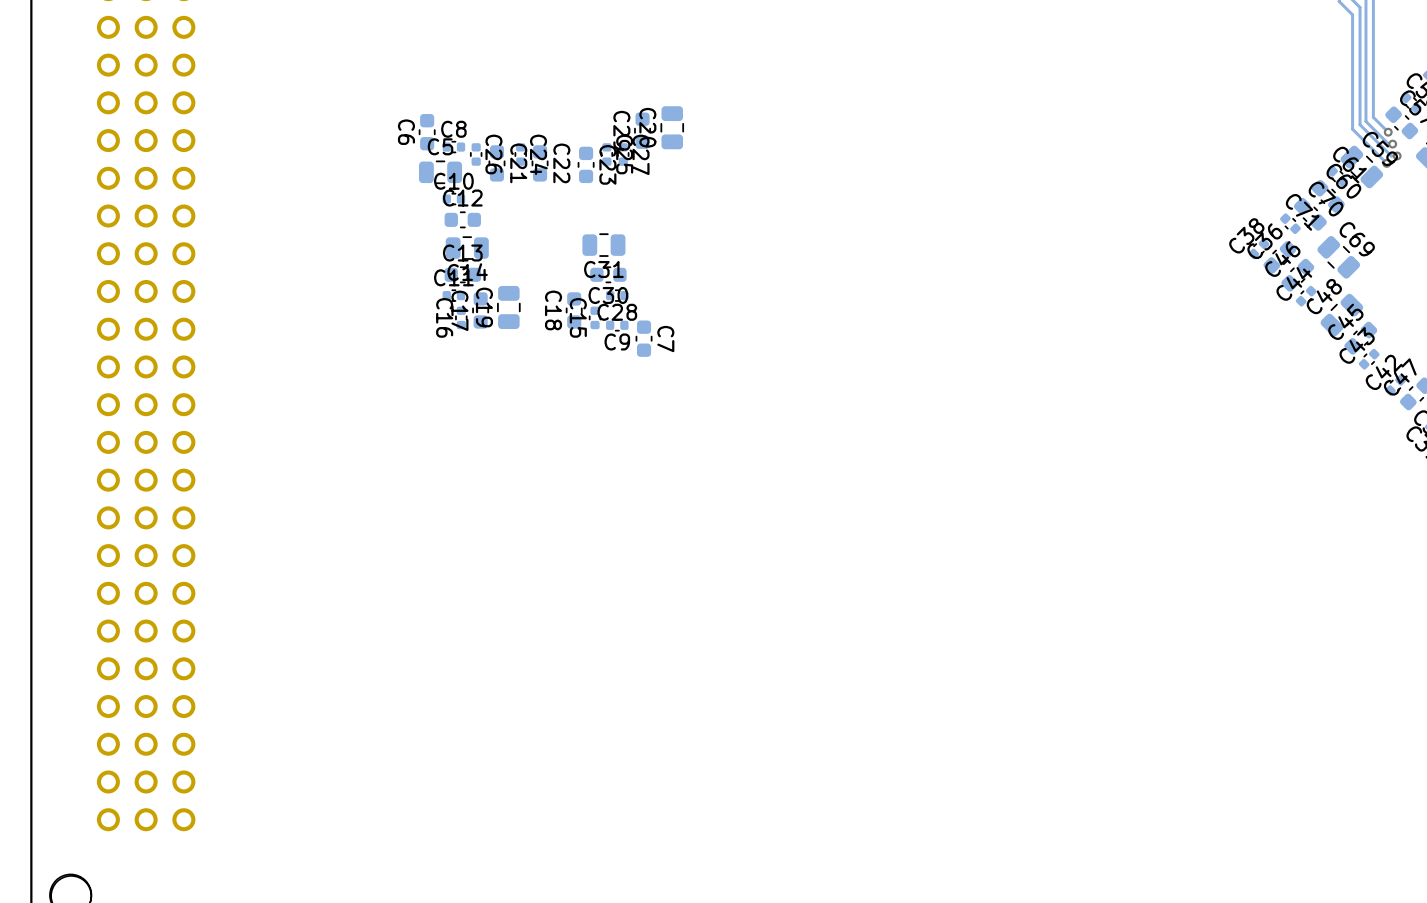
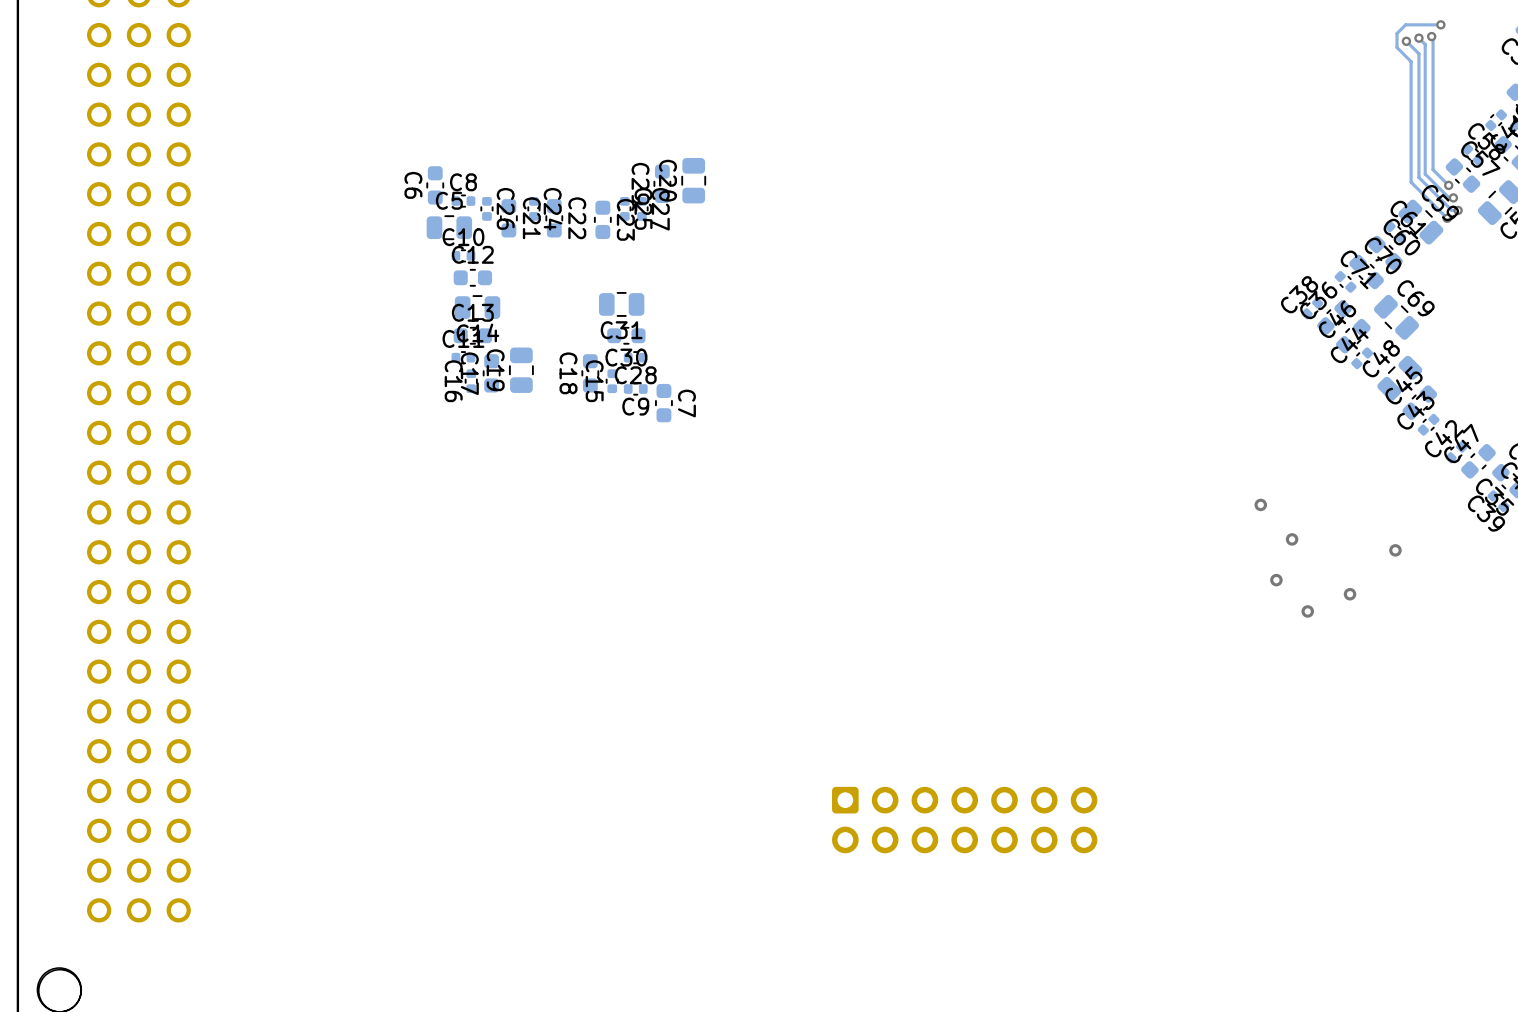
via: none -> (1260, 504)
via: none -> (1292, 539)
via: none -> (1395, 550)
via: none -> (1276, 580)
via: none -> (1350, 594)
via: none -> (1307, 611)
part: none -> (964, 820)

